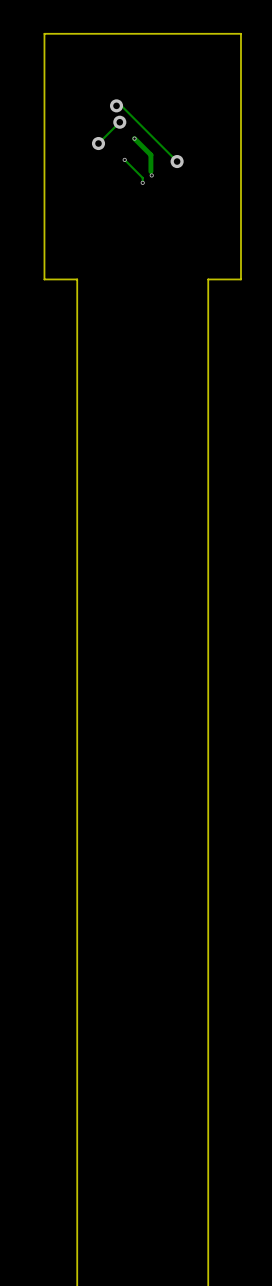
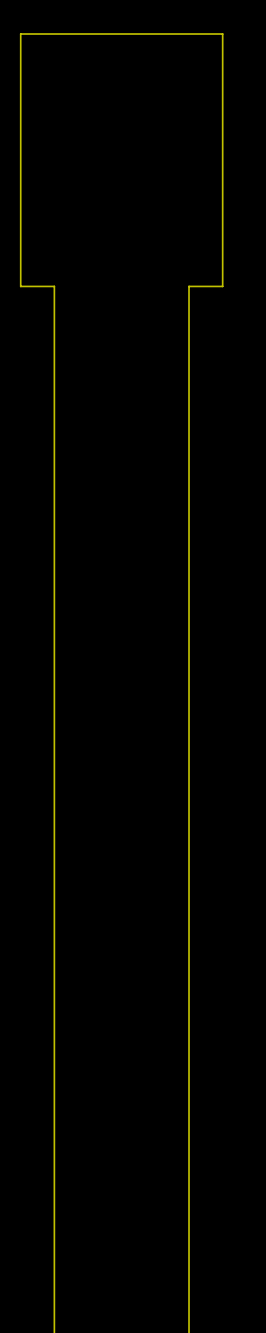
via: (116, 105) -> none
track: (121, 105) (177, 161) -> none
track: (119, 122) (98, 143) -> none
via: (119, 122) -> none
track: (134, 138) (150, 154) (150, 171) -> none
via: (134, 138) -> none
via: (98, 143) -> none
track: (124, 159) (142, 177) (142, 182) -> none
via: (124, 159) -> none
via: (177, 161) -> none
via: (151, 175) -> none
via: (142, 182) -> none

